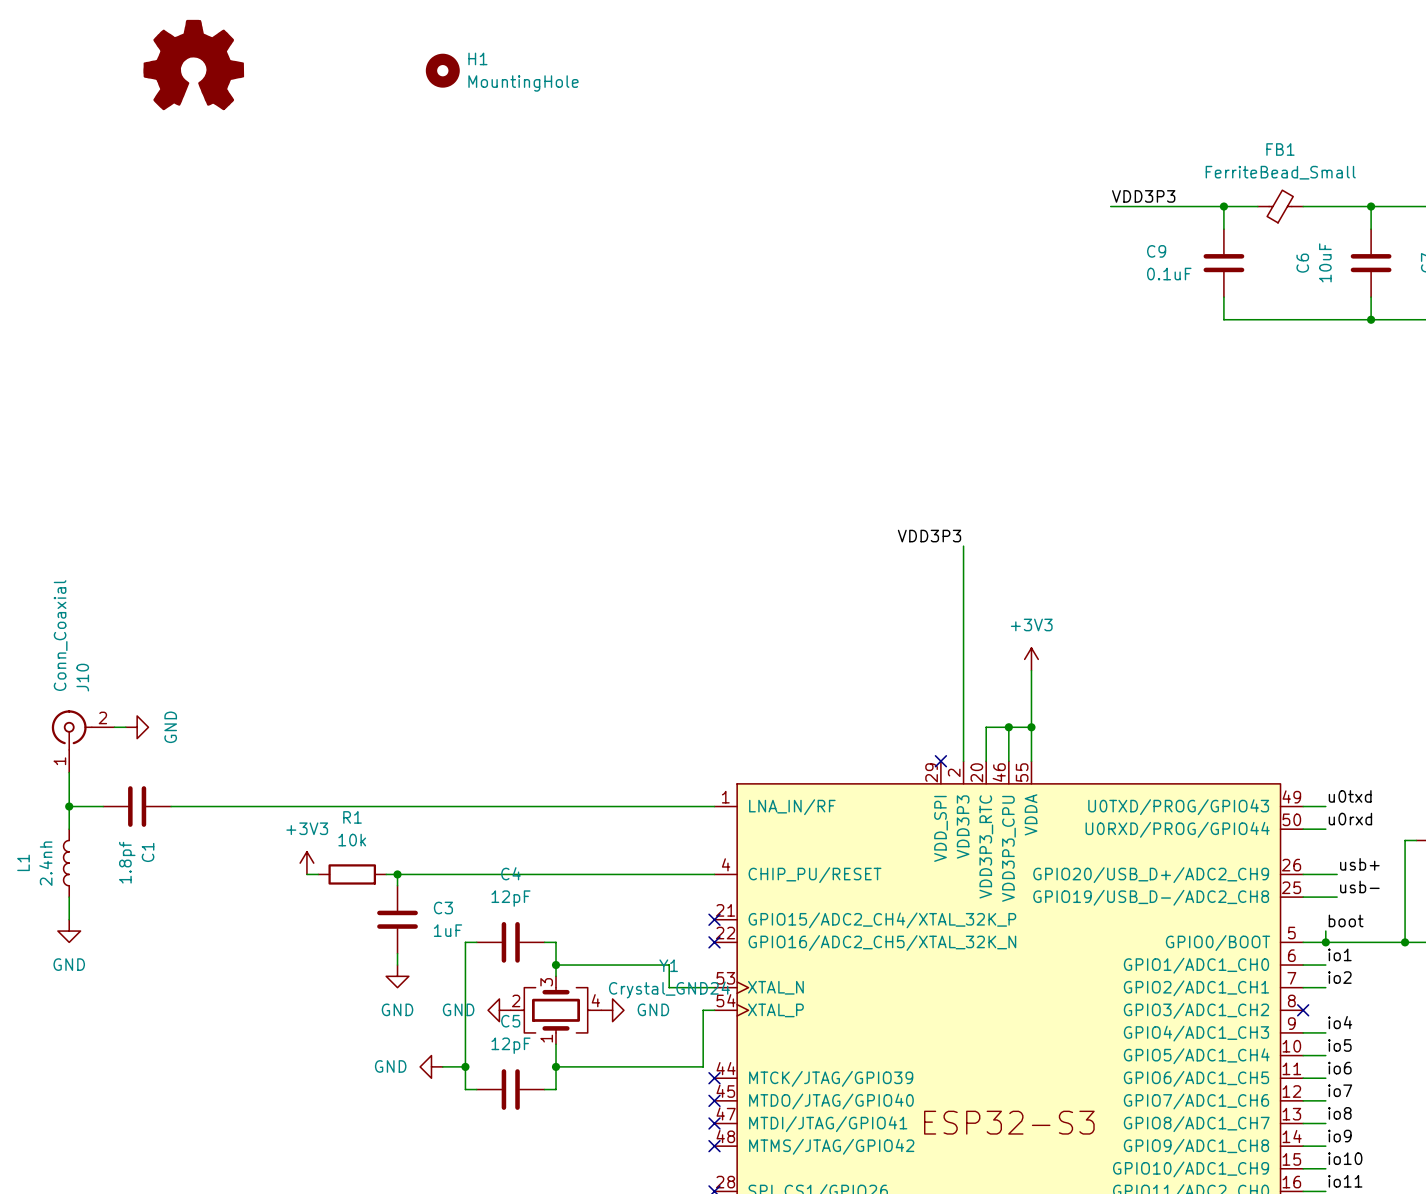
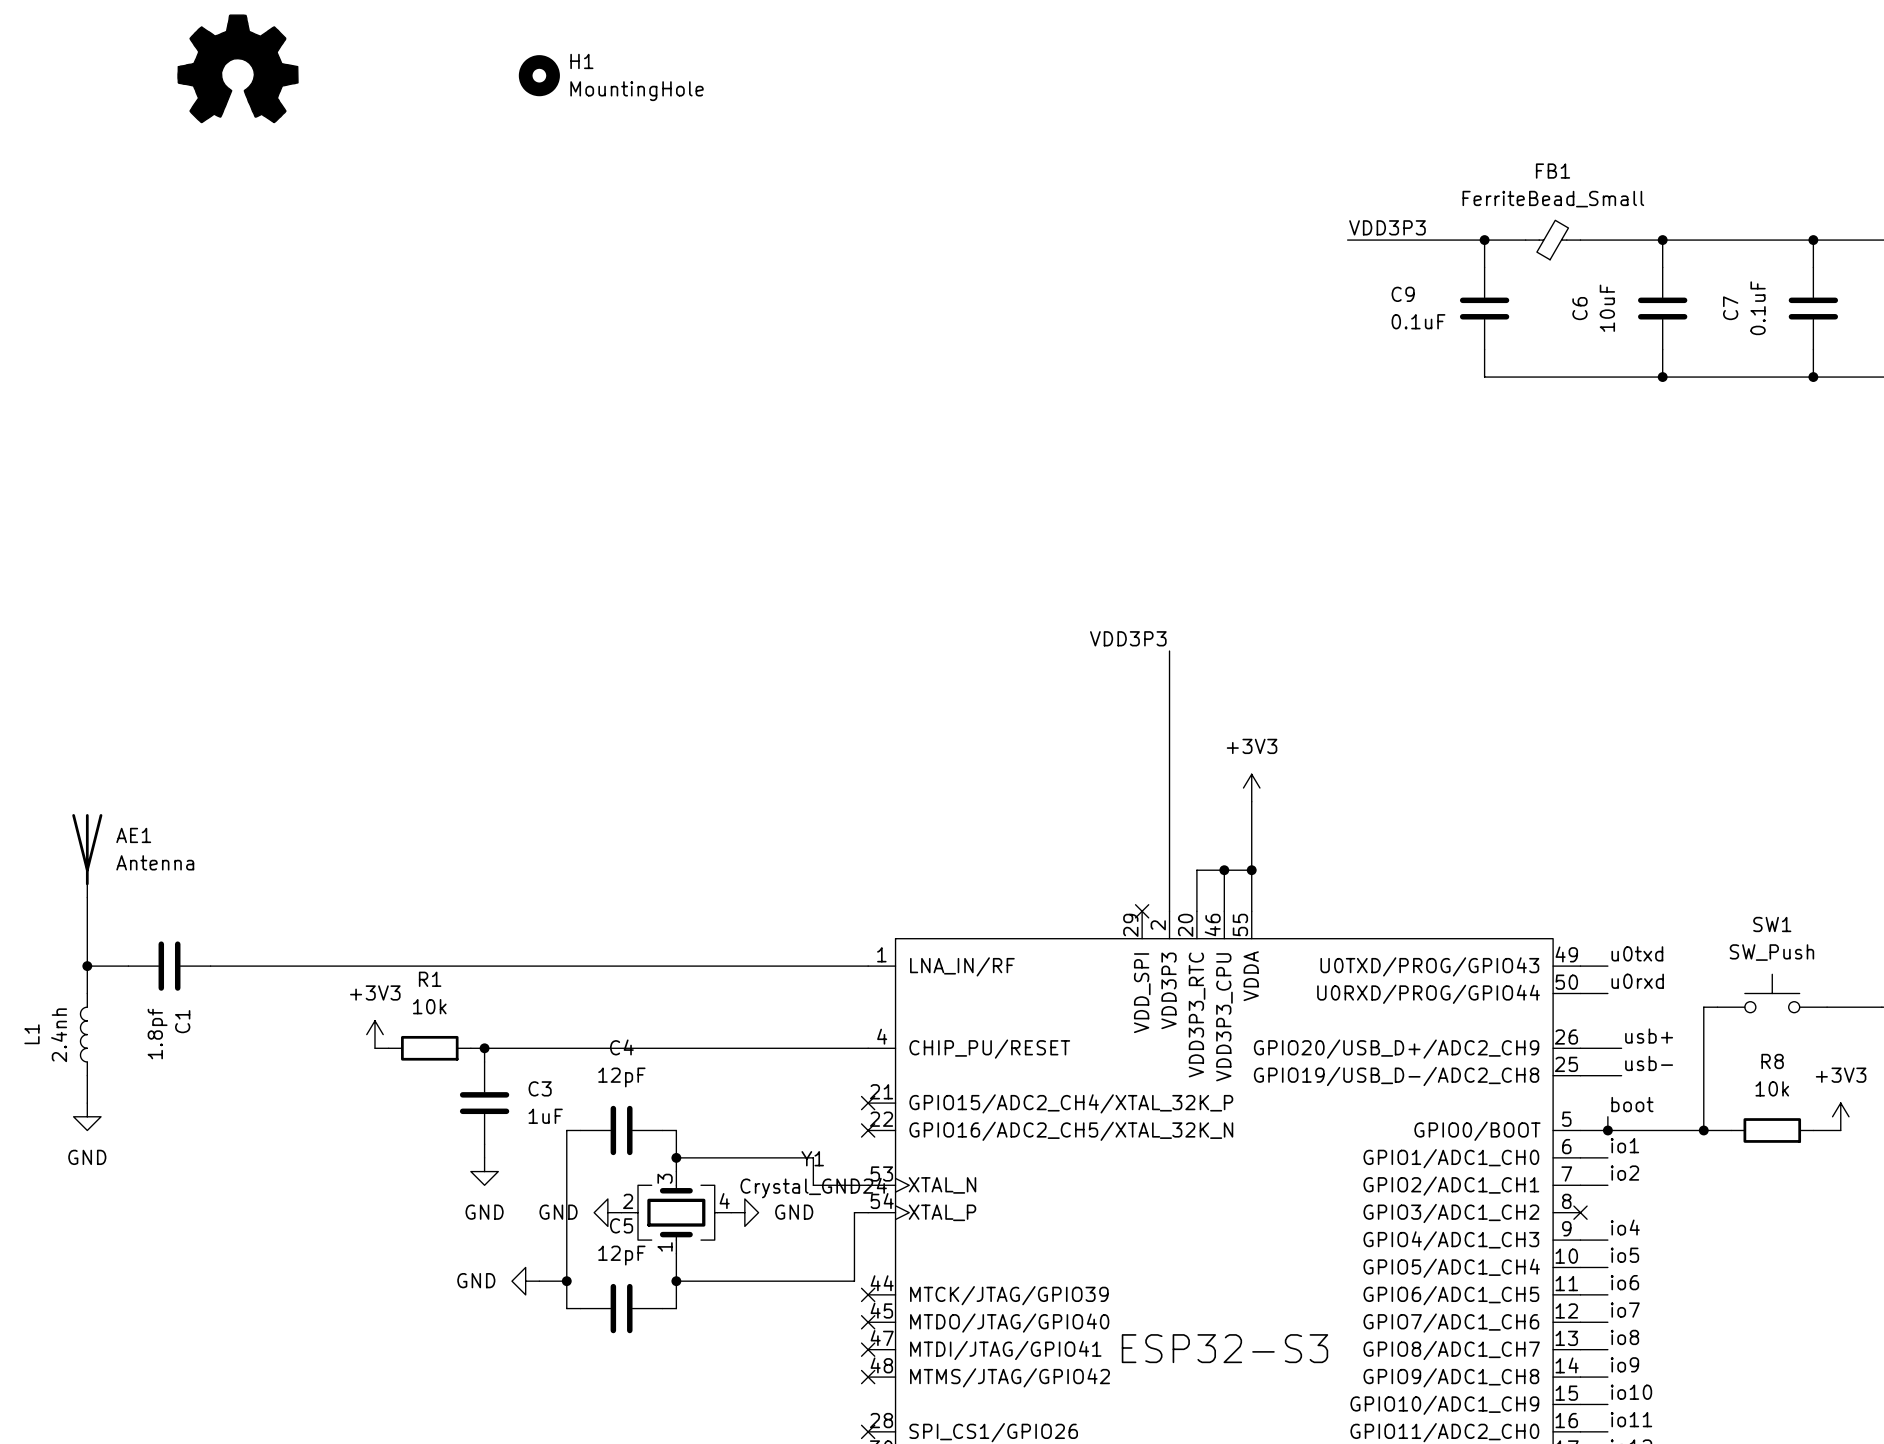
AE1: none -> Antenna (87, 855)
wire: (114, 727) (125, 727) -> none
power symbol: GND (137, 727) -> none
J10: Conn_Coaxial (83, 741) -> none

